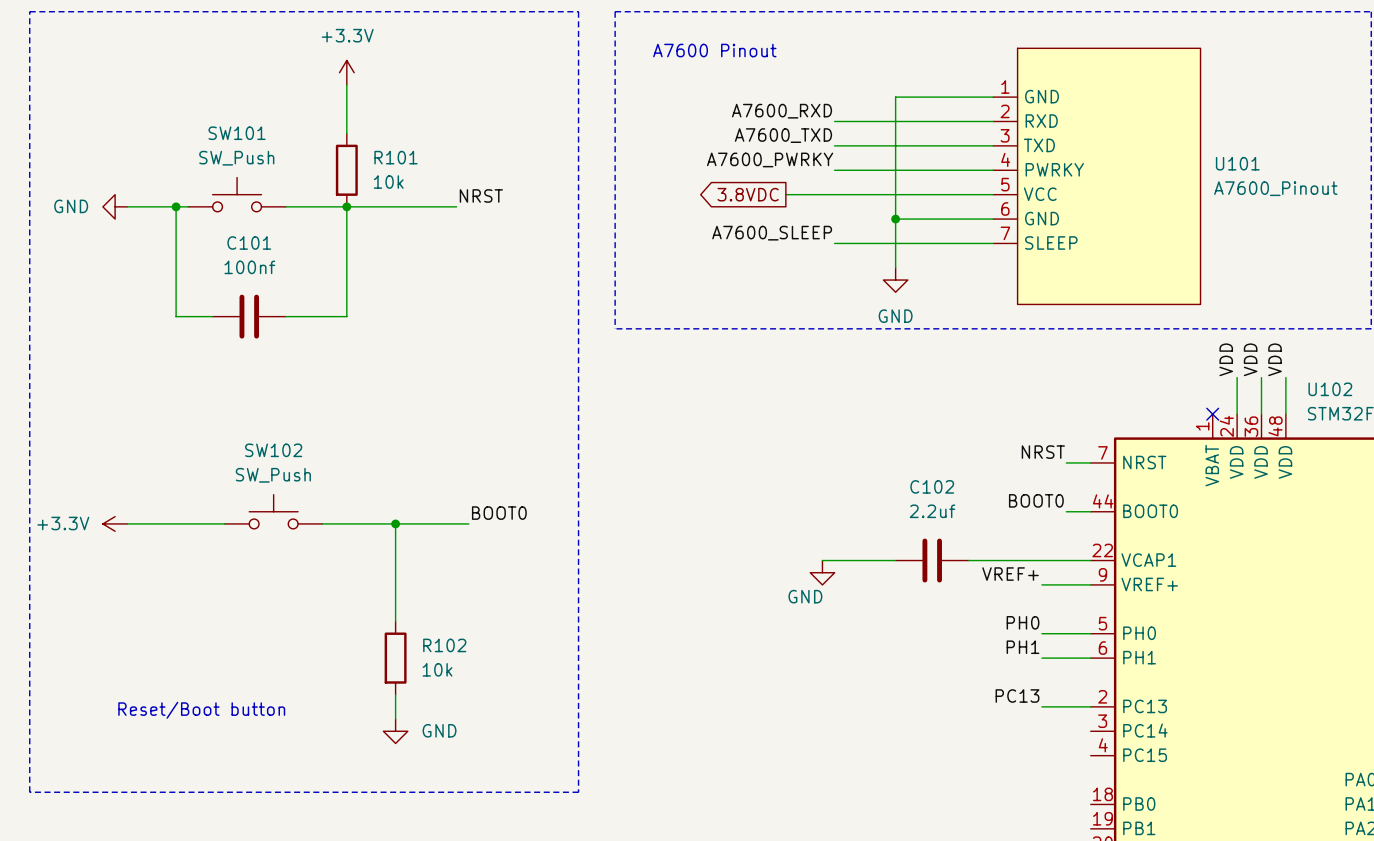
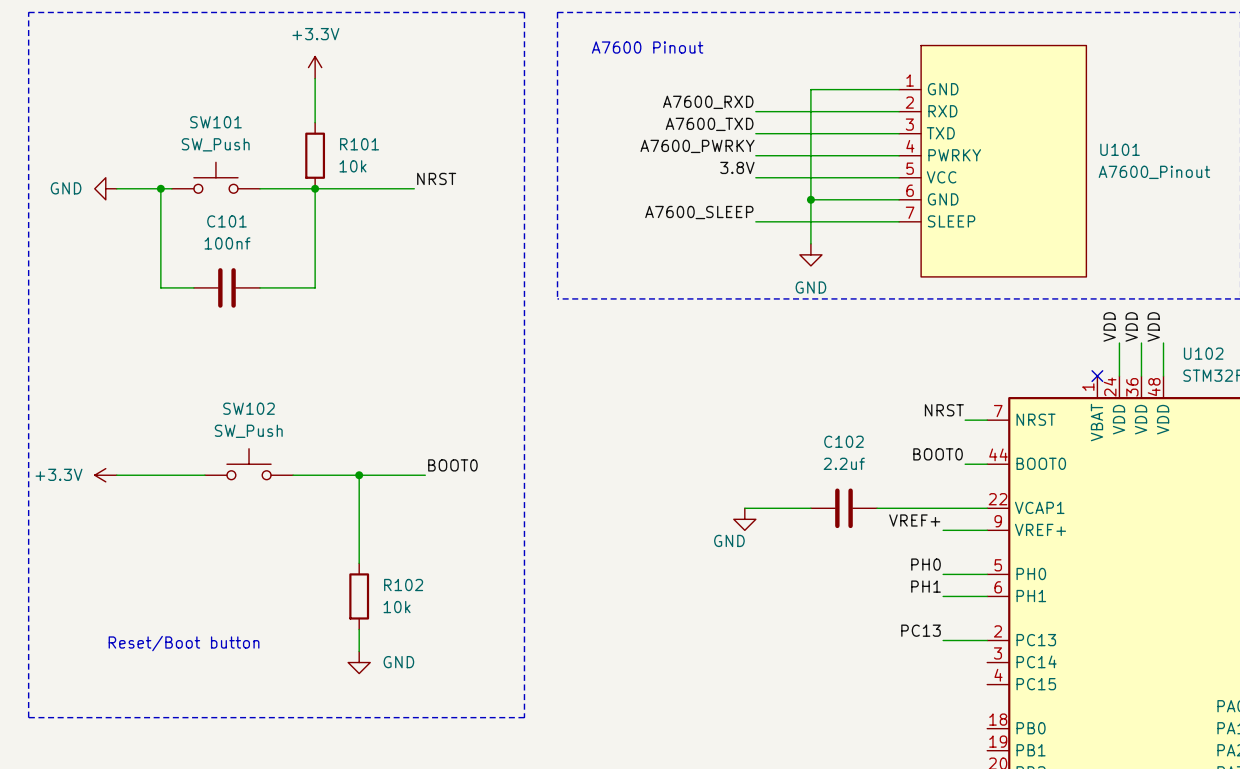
label: none -> 3.8V (737, 167)
global label: 3.8VDC (748, 194) -> none
wire: (785, 194) (834, 194) -> none

